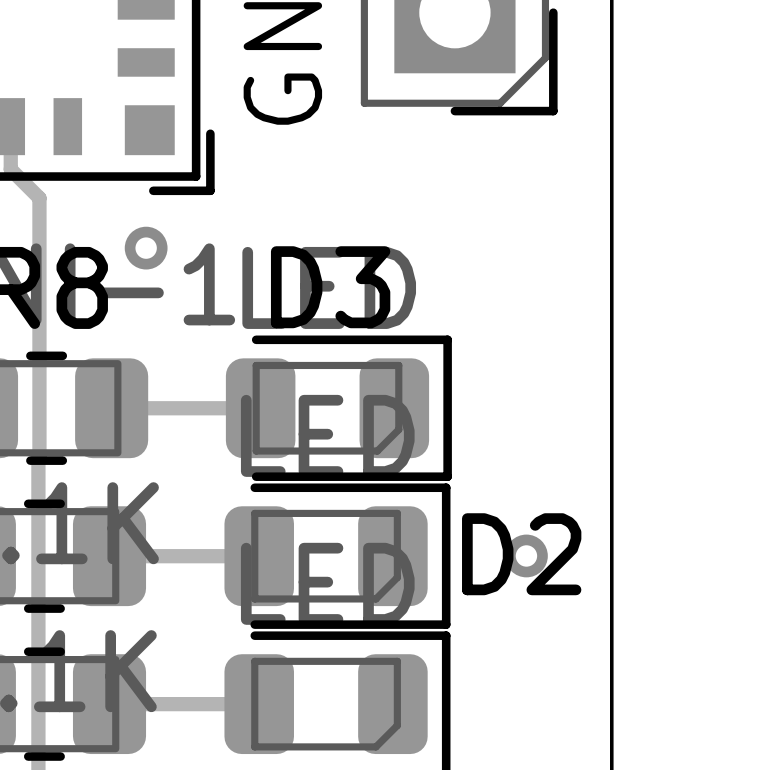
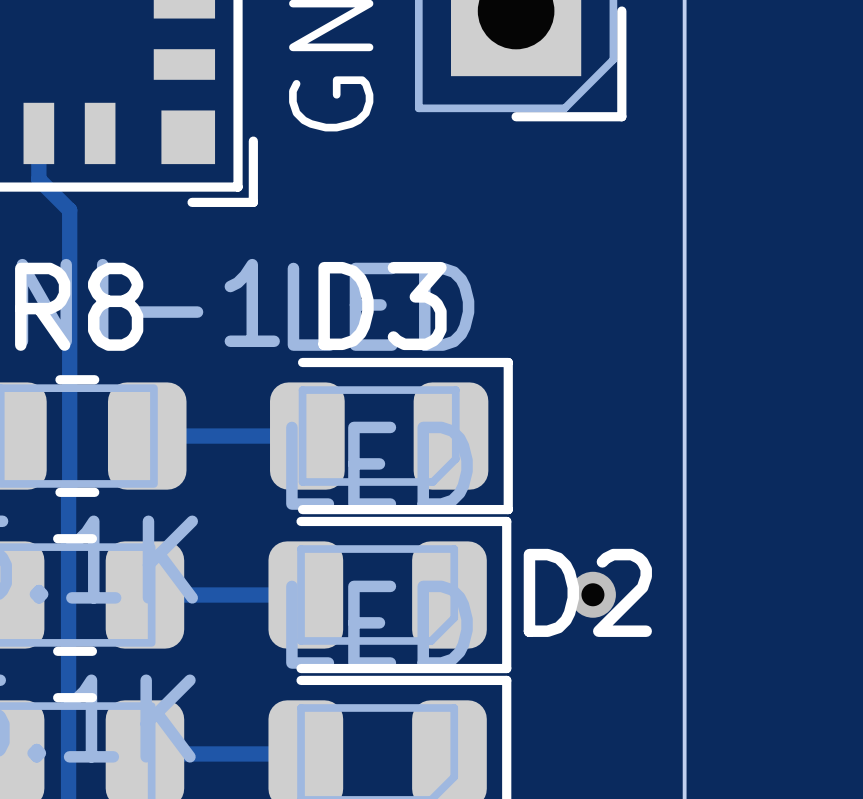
via: (146, 248) -> none

